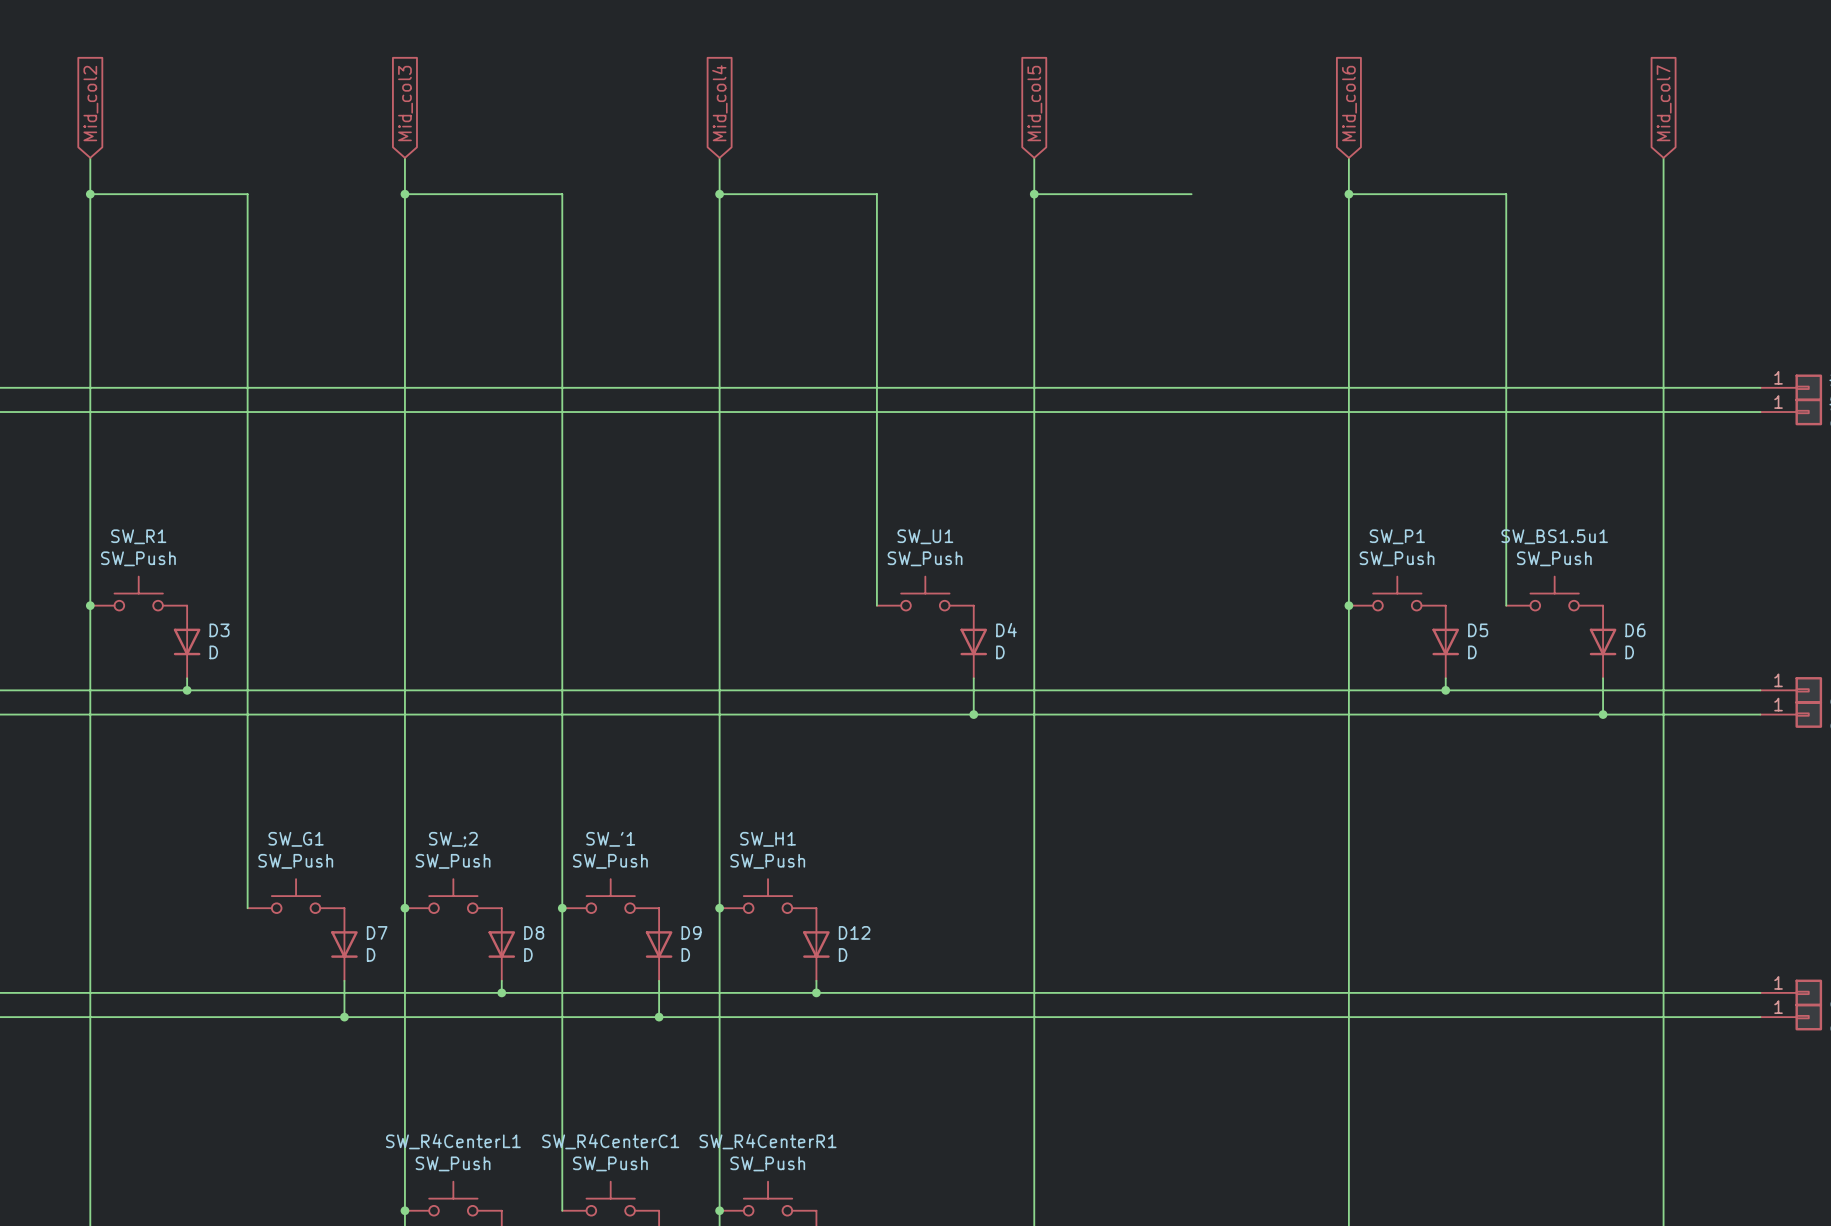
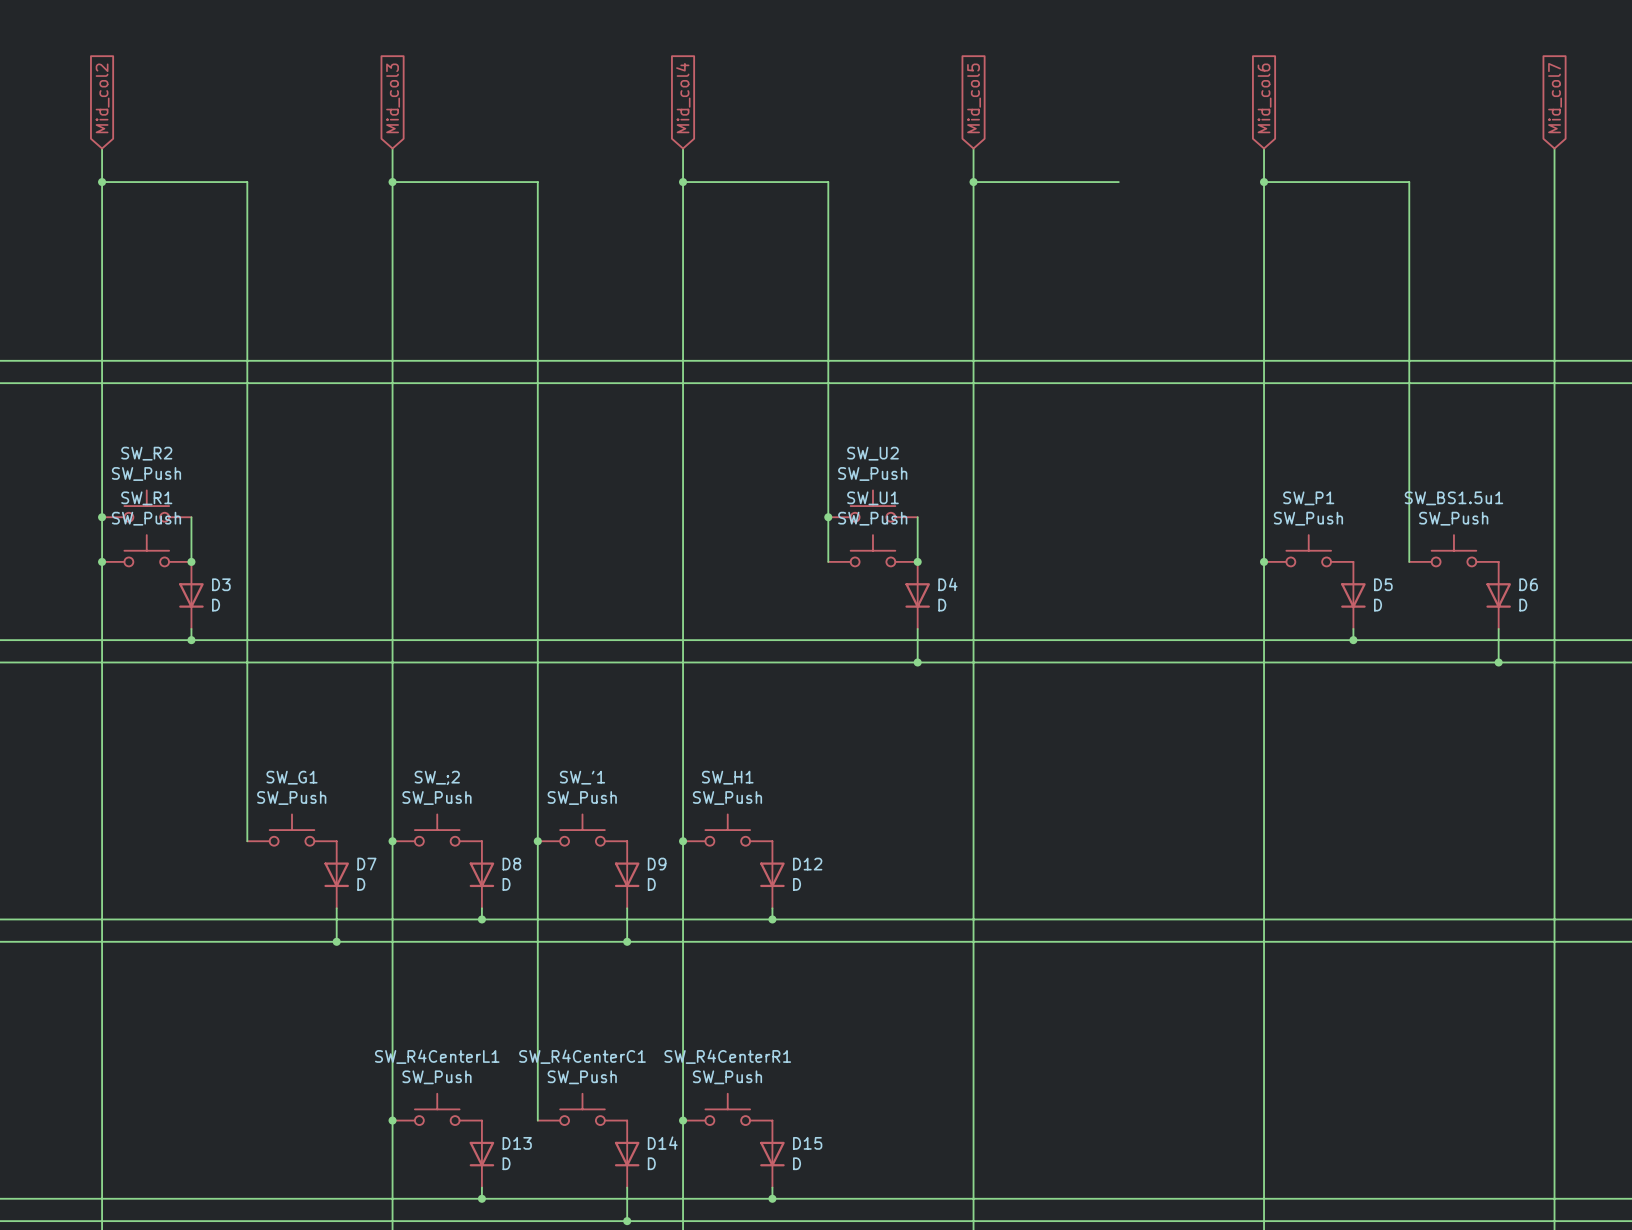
SW_R2: none -> SW_Push (146, 506)
SW_U2: none -> SW_Push (872, 506)
junction: none -> (102, 517)
wire: none -> (191, 517) (191, 561)
junction: none -> (828, 517)
wire: none -> (917, 517) (917, 561)
junction: none -> (191, 561)
junction: none -> (917, 561)

